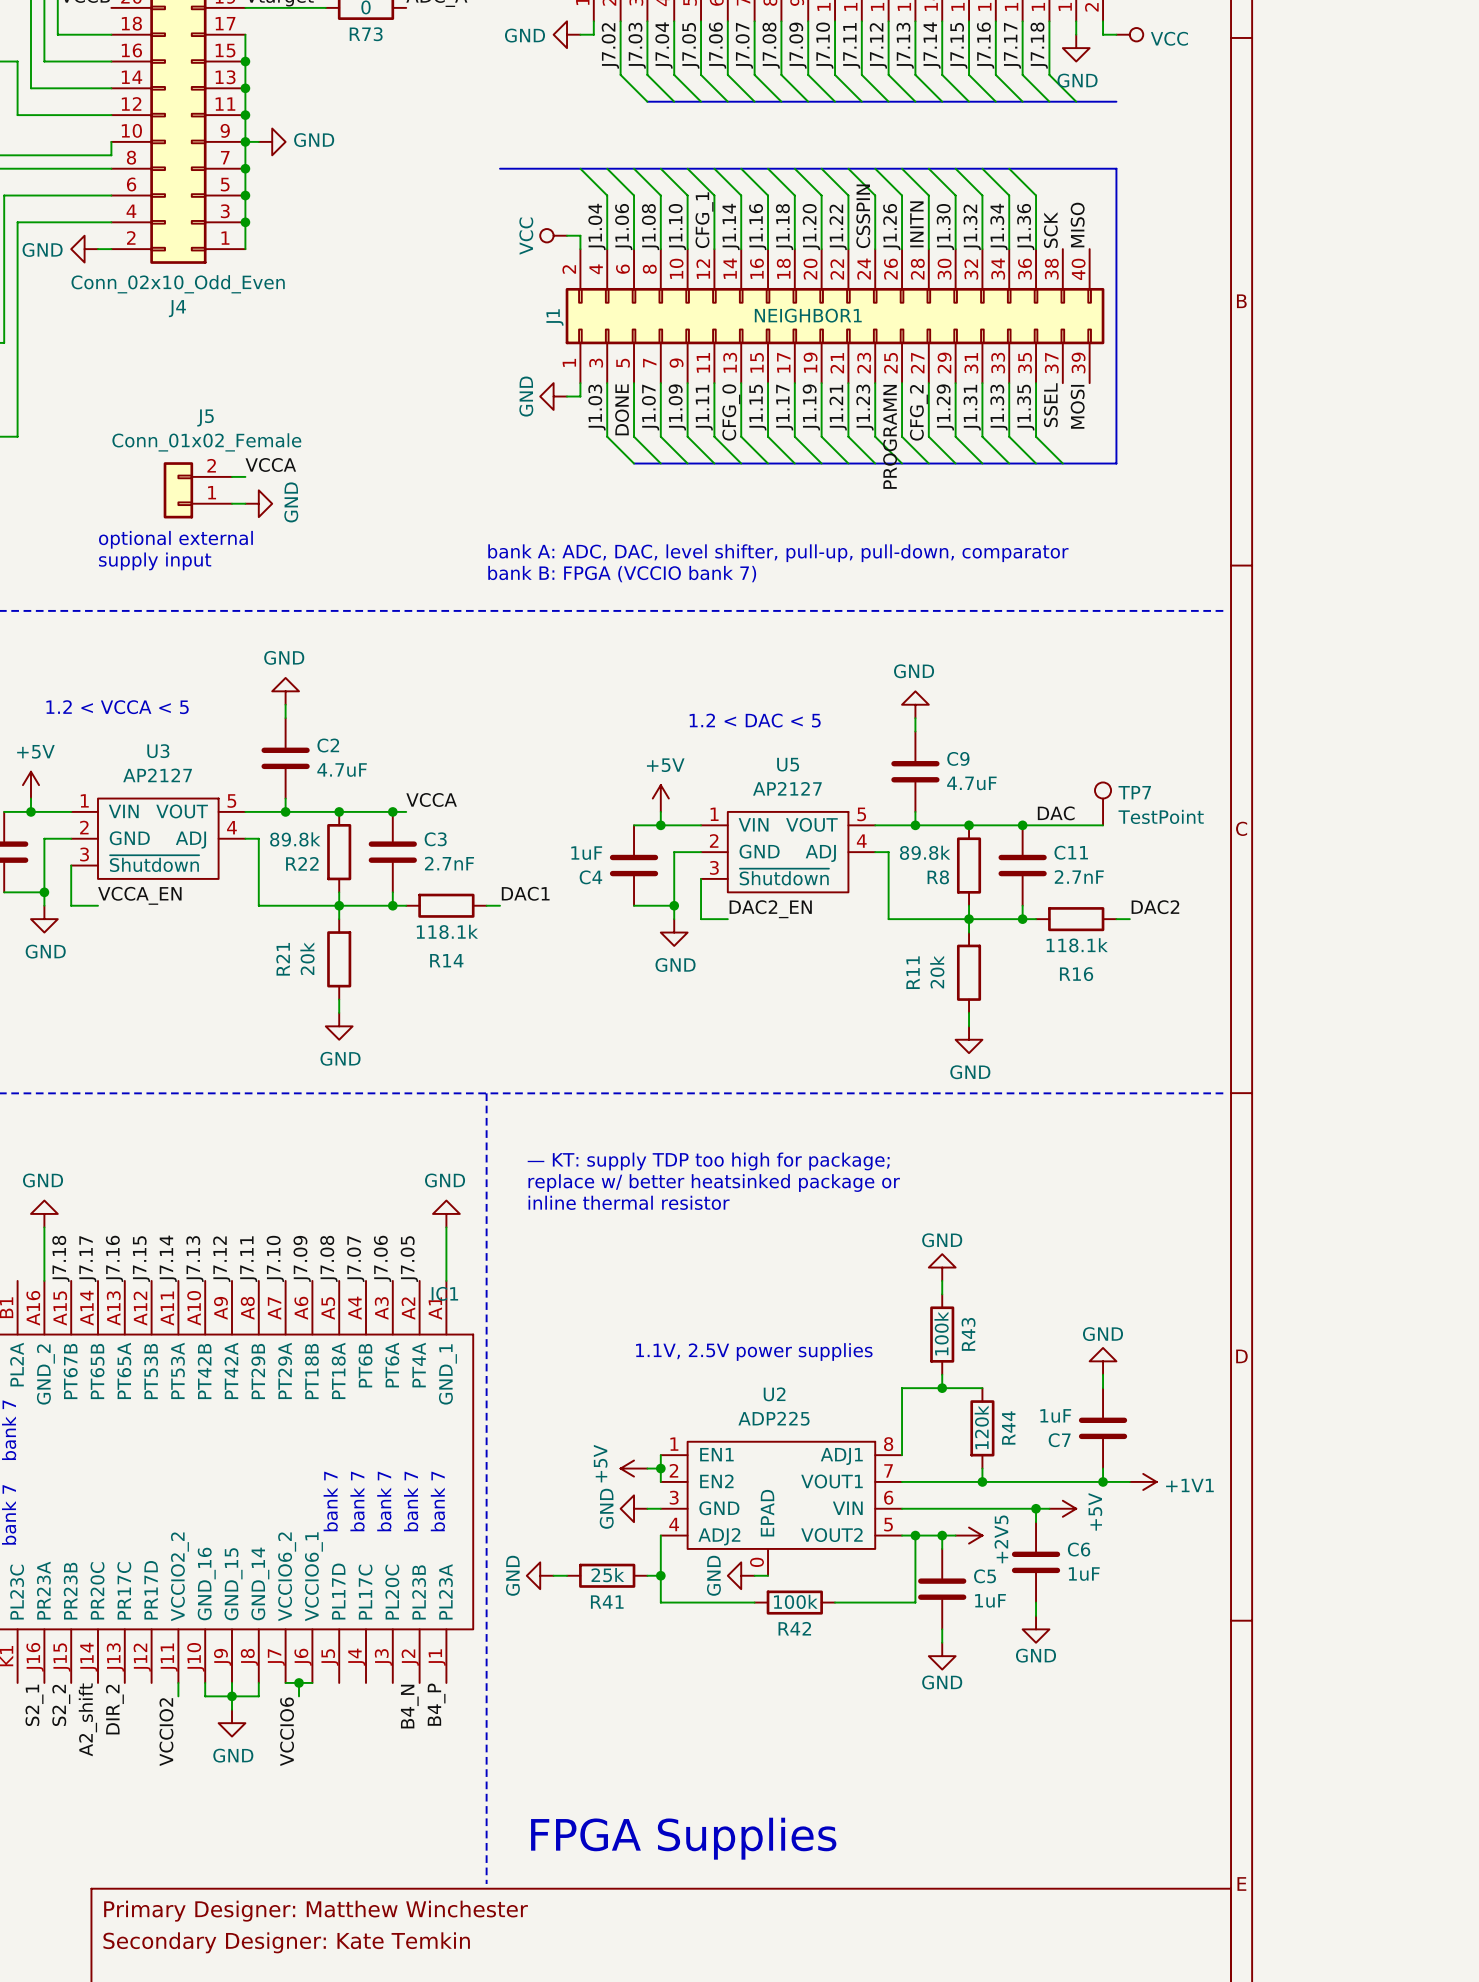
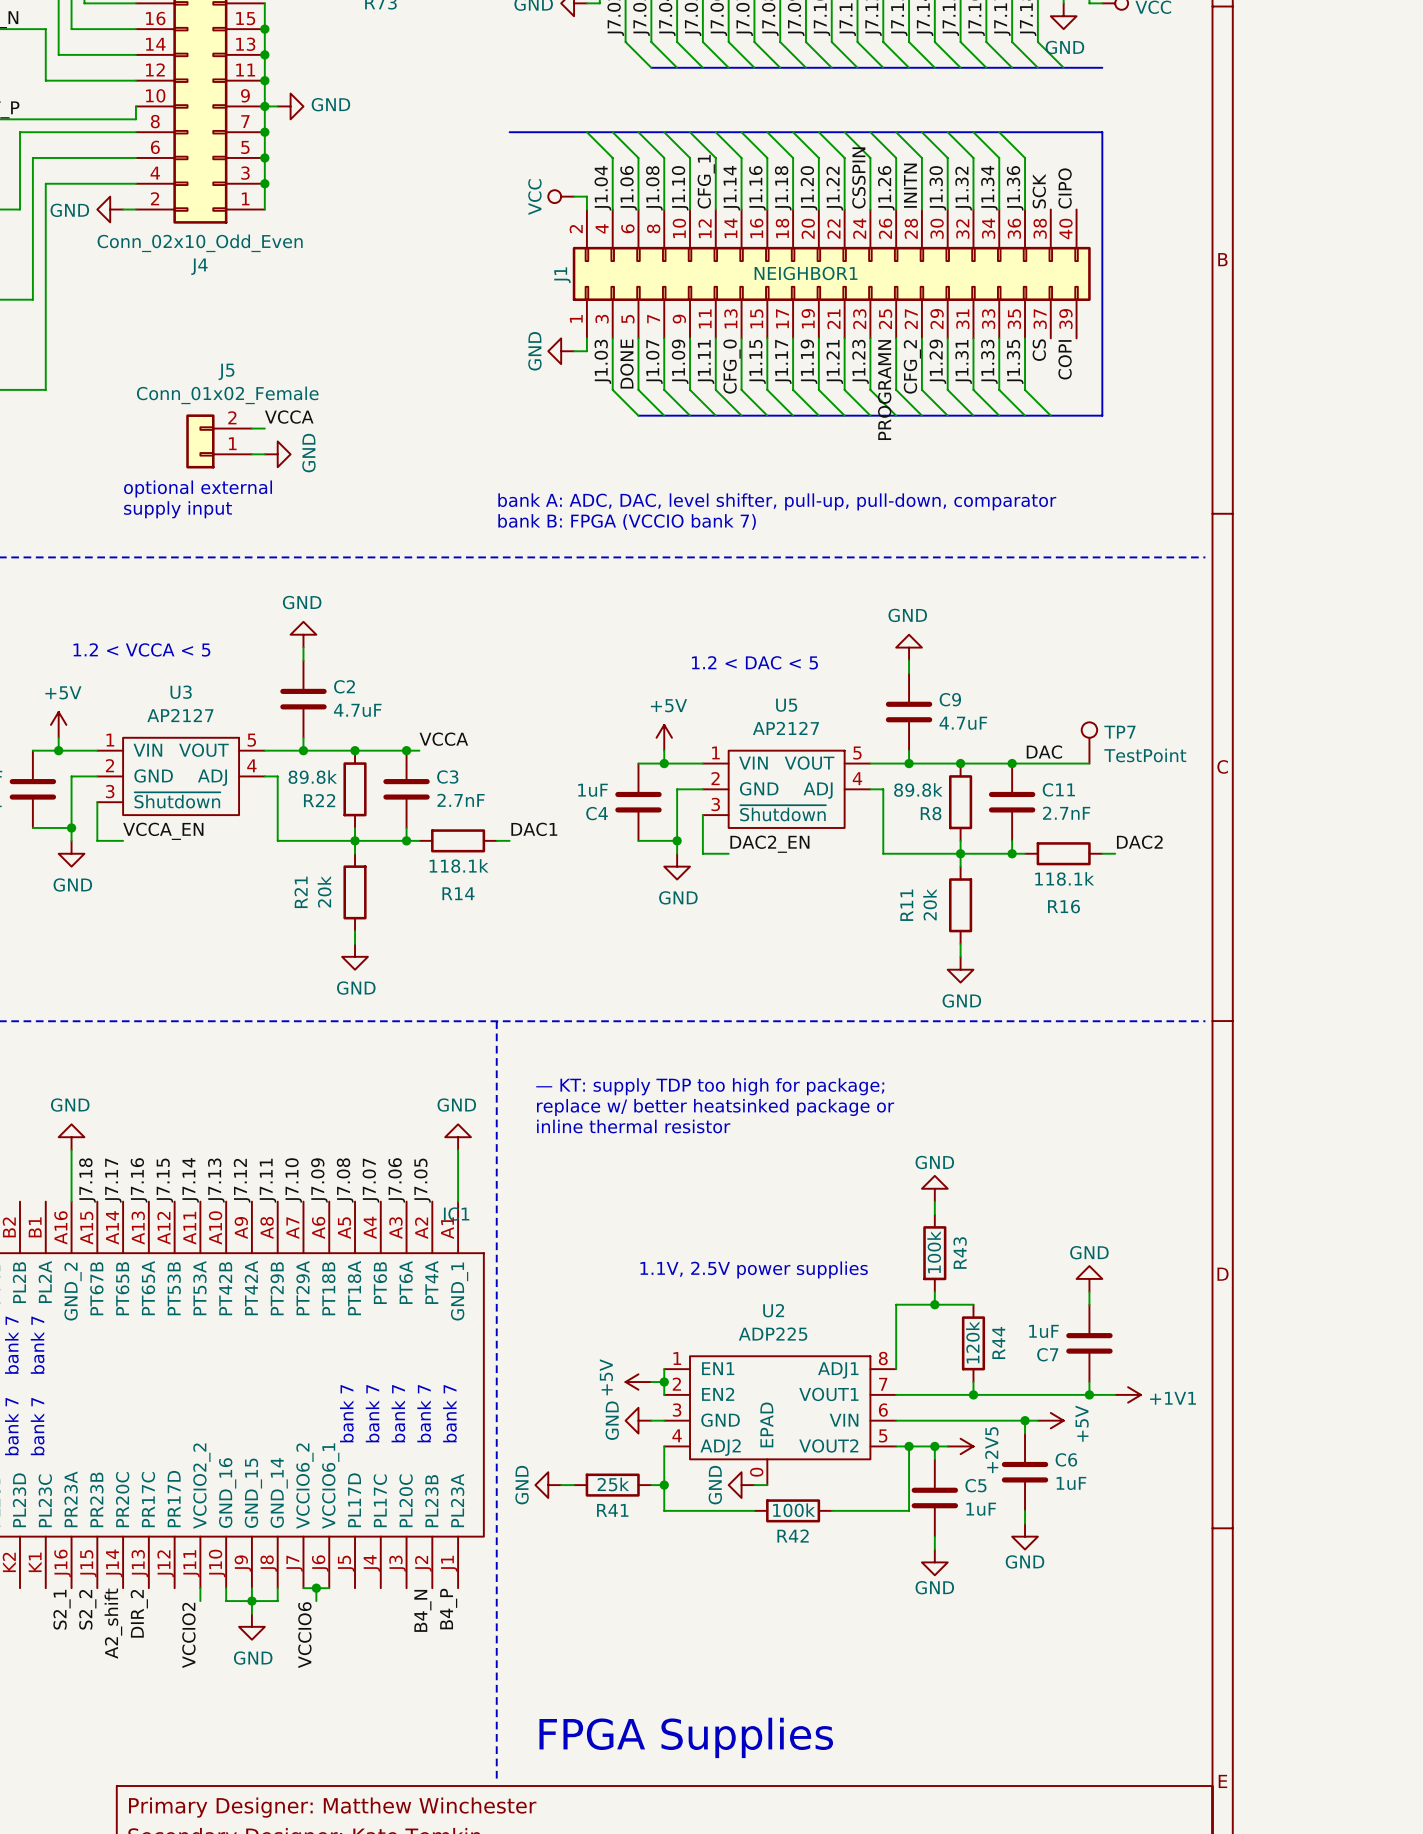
label: MISO (1077, 225) -> CIPO (1065, 188)
label: SSEL (1050, 405) -> CS (1039, 350)
label: MOSI (1077, 406) -> COPI (1065, 359)

